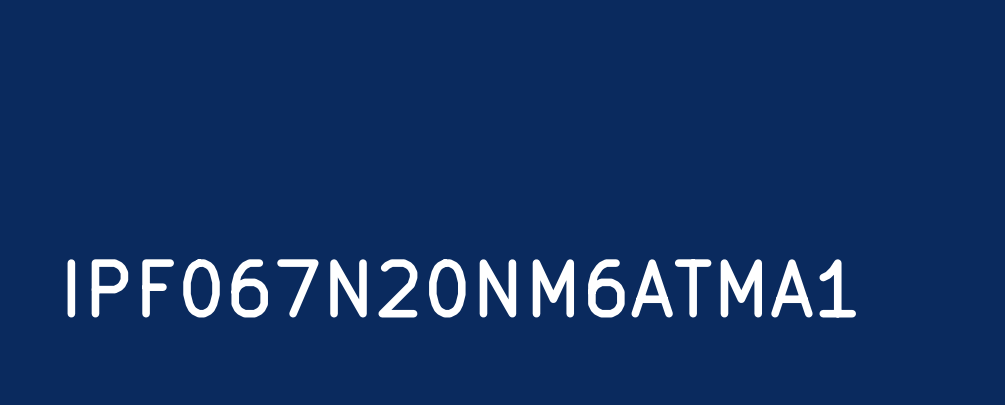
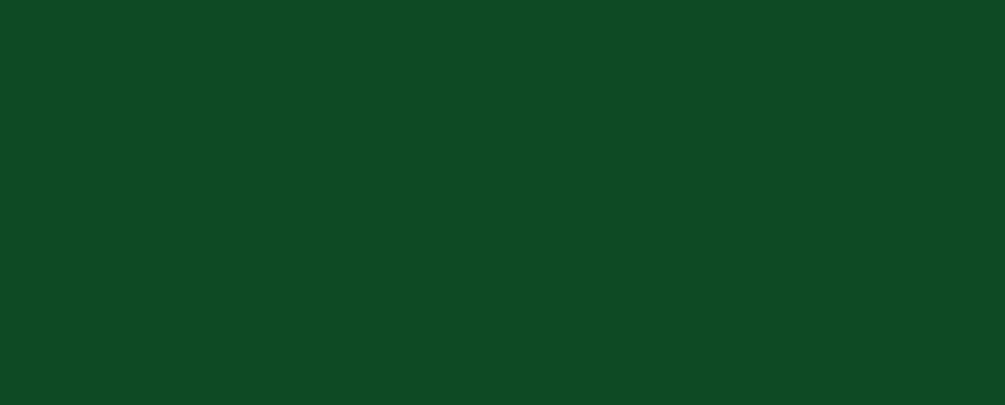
text: IPF067N20NM6ATMA1 (461, 288) -> none

